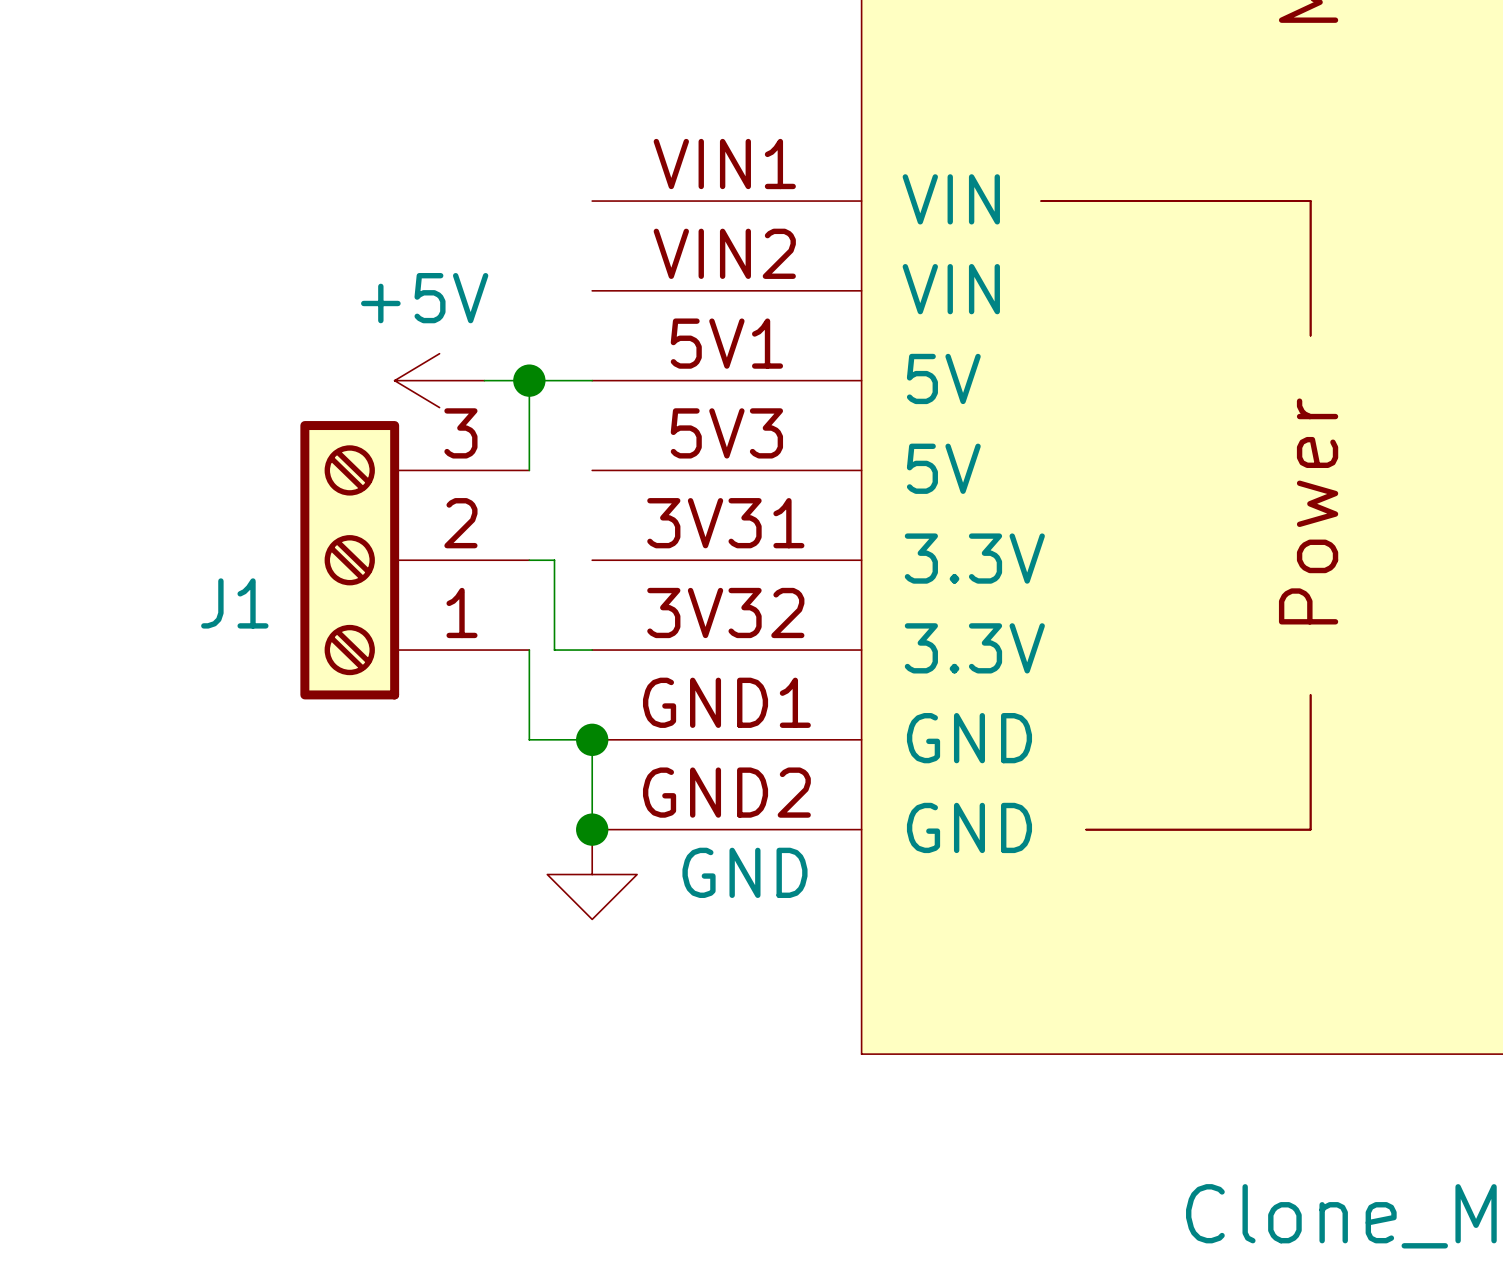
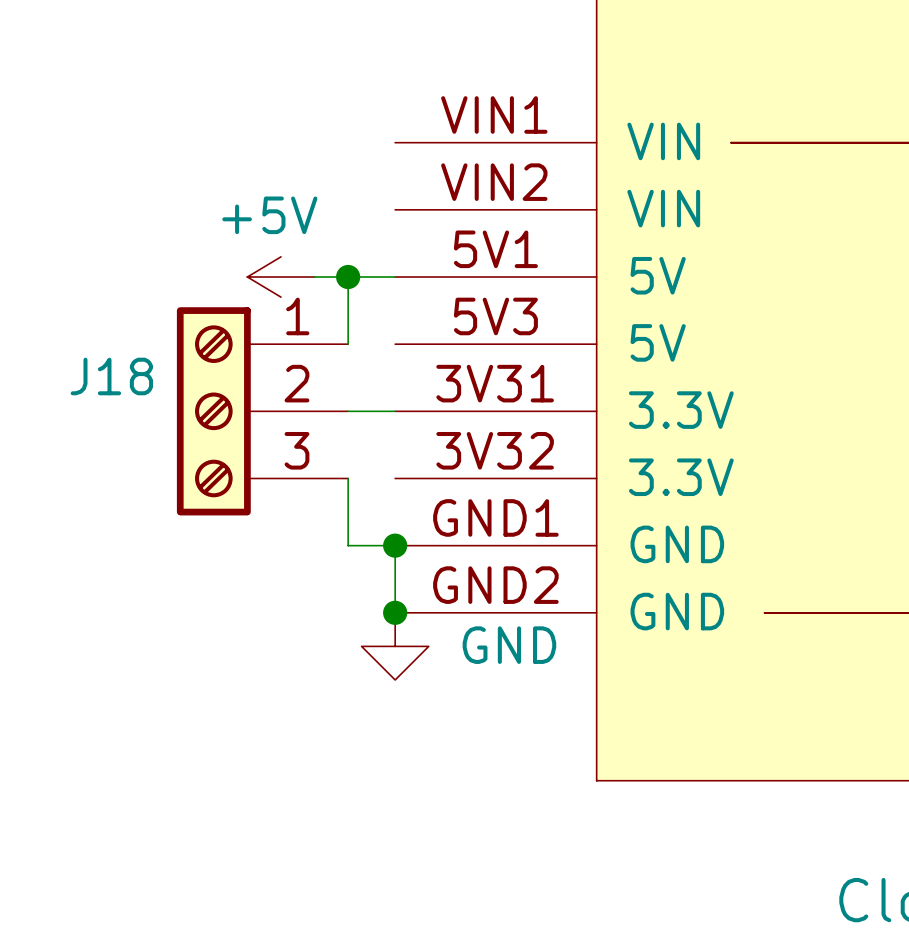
J1: (414, 560) -> none
J18: none -> (262, 411)
wire: (554, 560) (554, 650) (592, 650) -> (366, 411) (395, 411)

